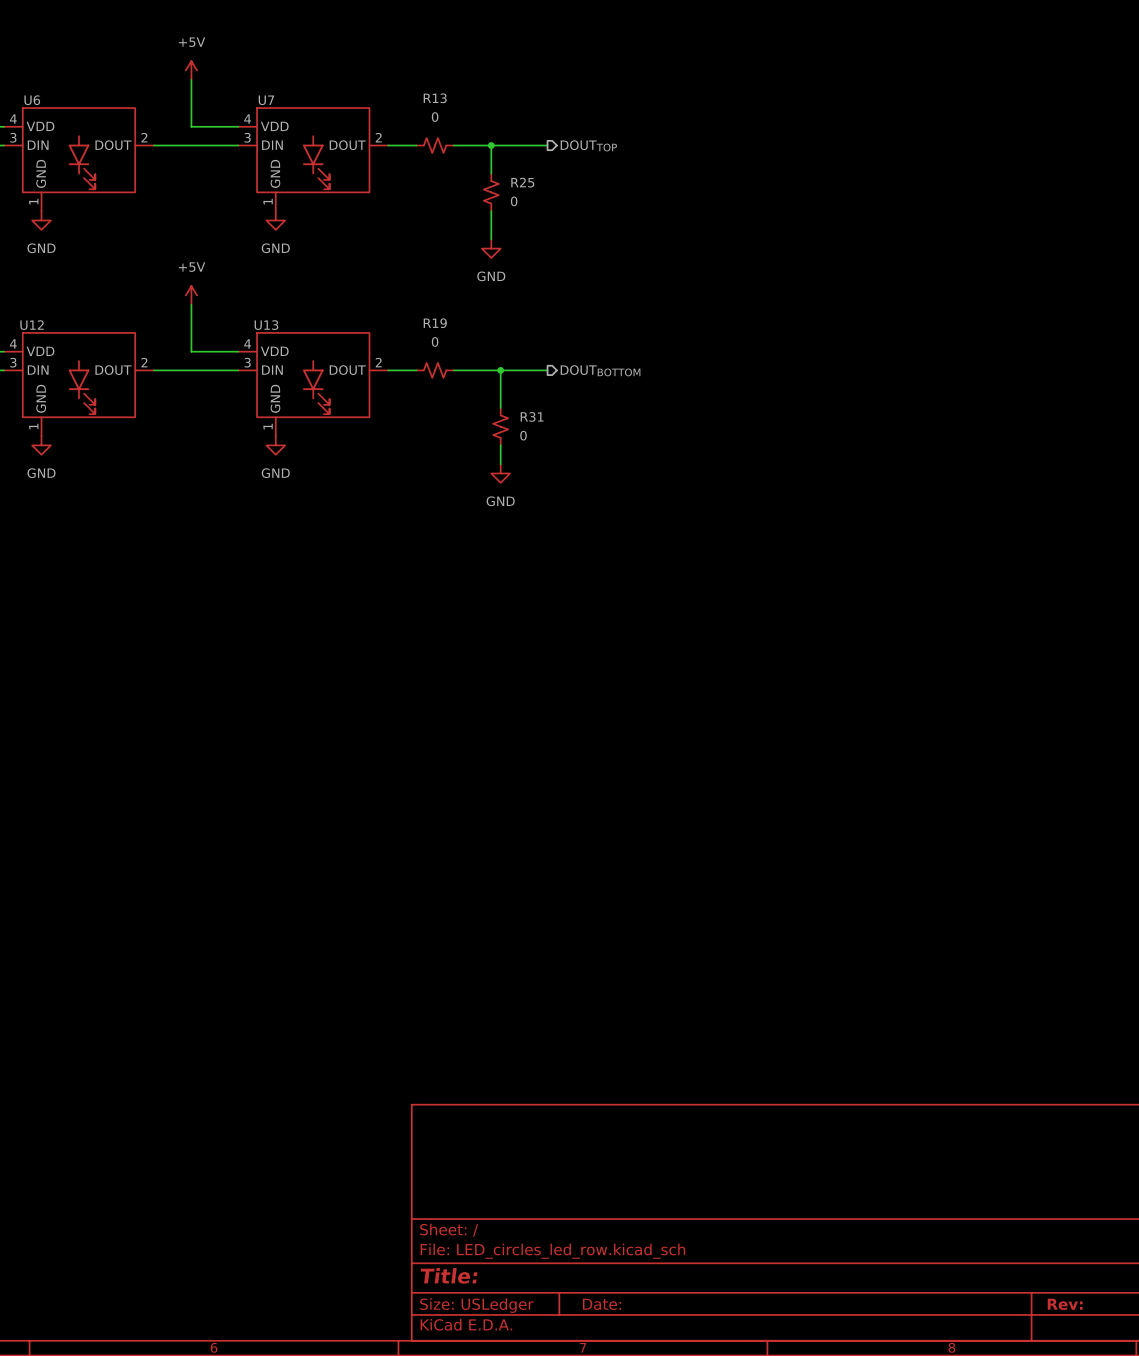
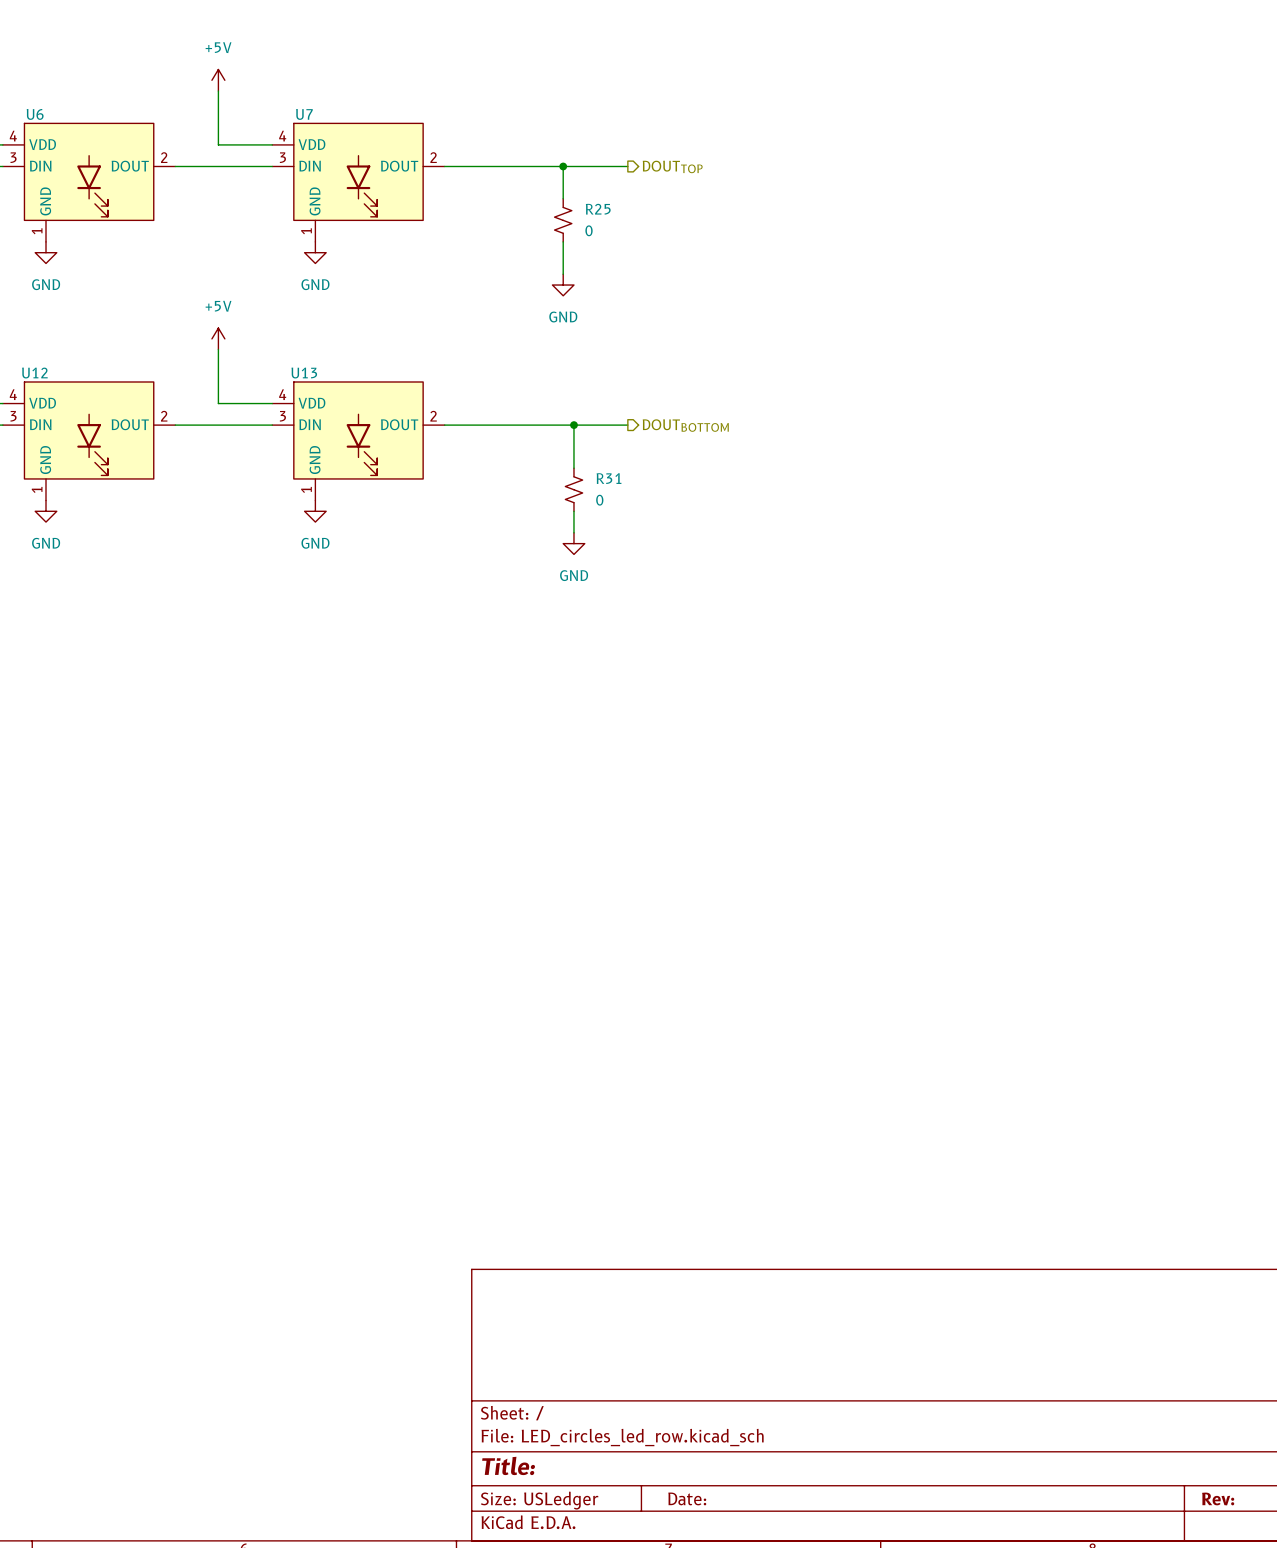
R13: 0 (435, 145) -> none
R19: 0 (435, 370) -> none

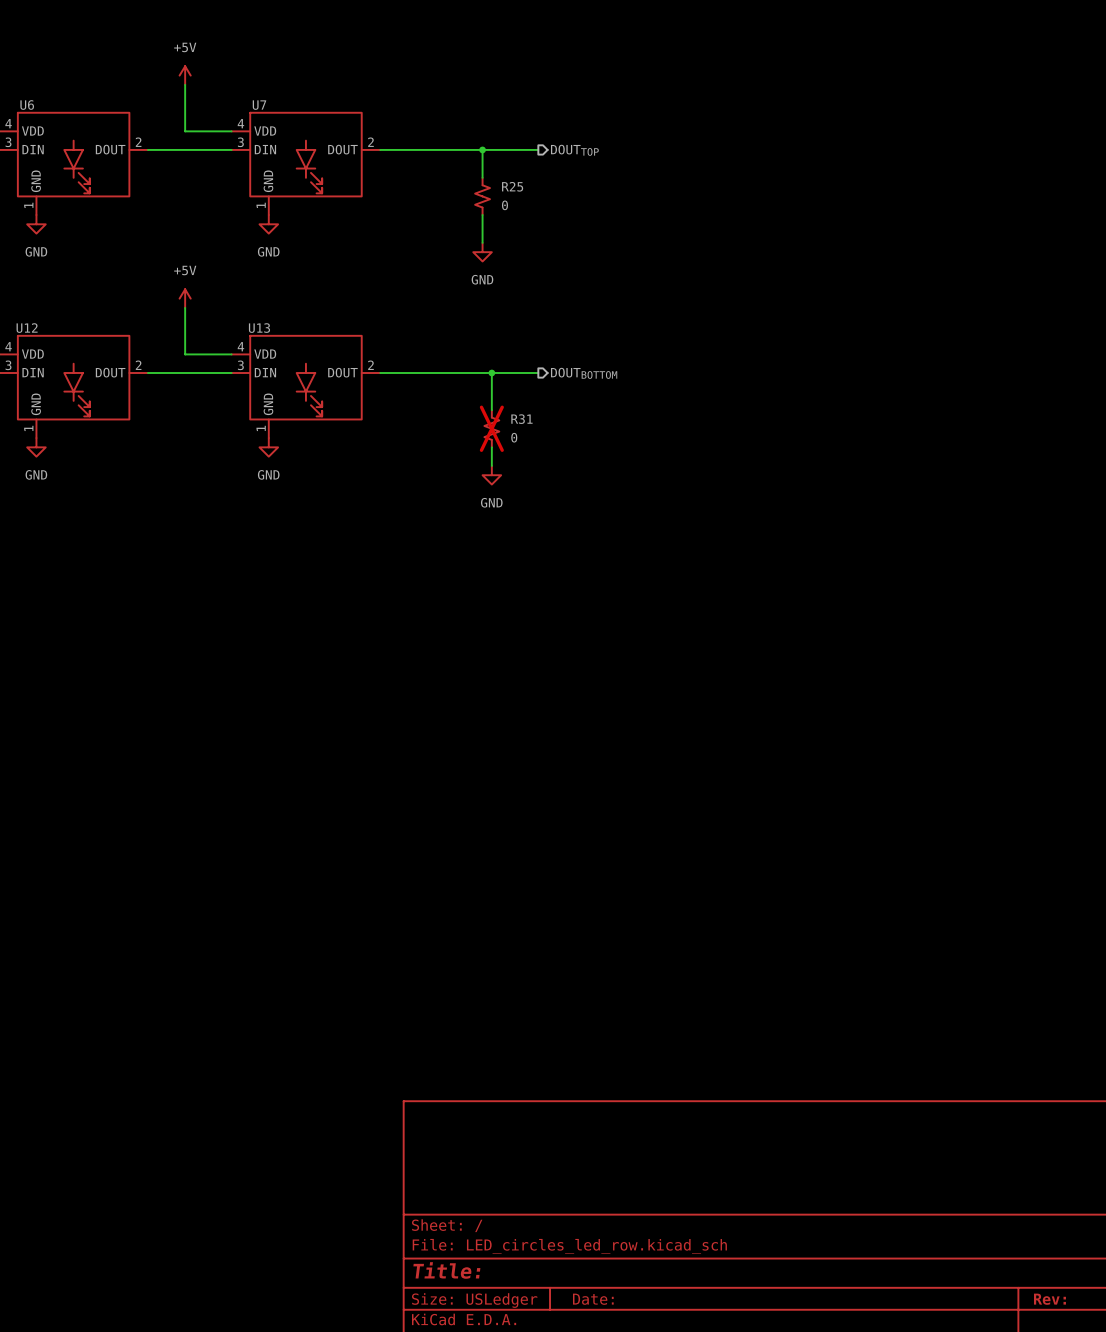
R31 do-not-place cross: none -> (491, 428)

